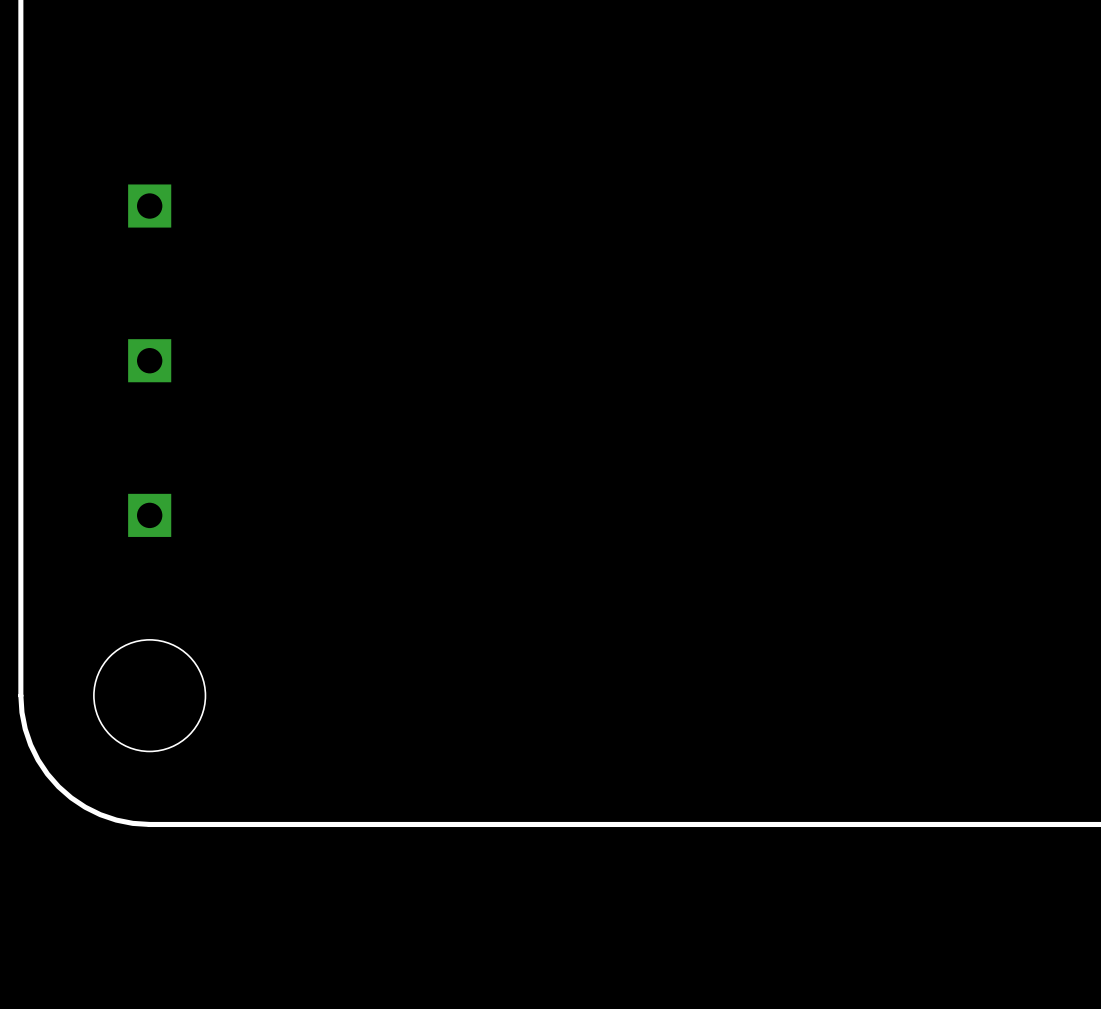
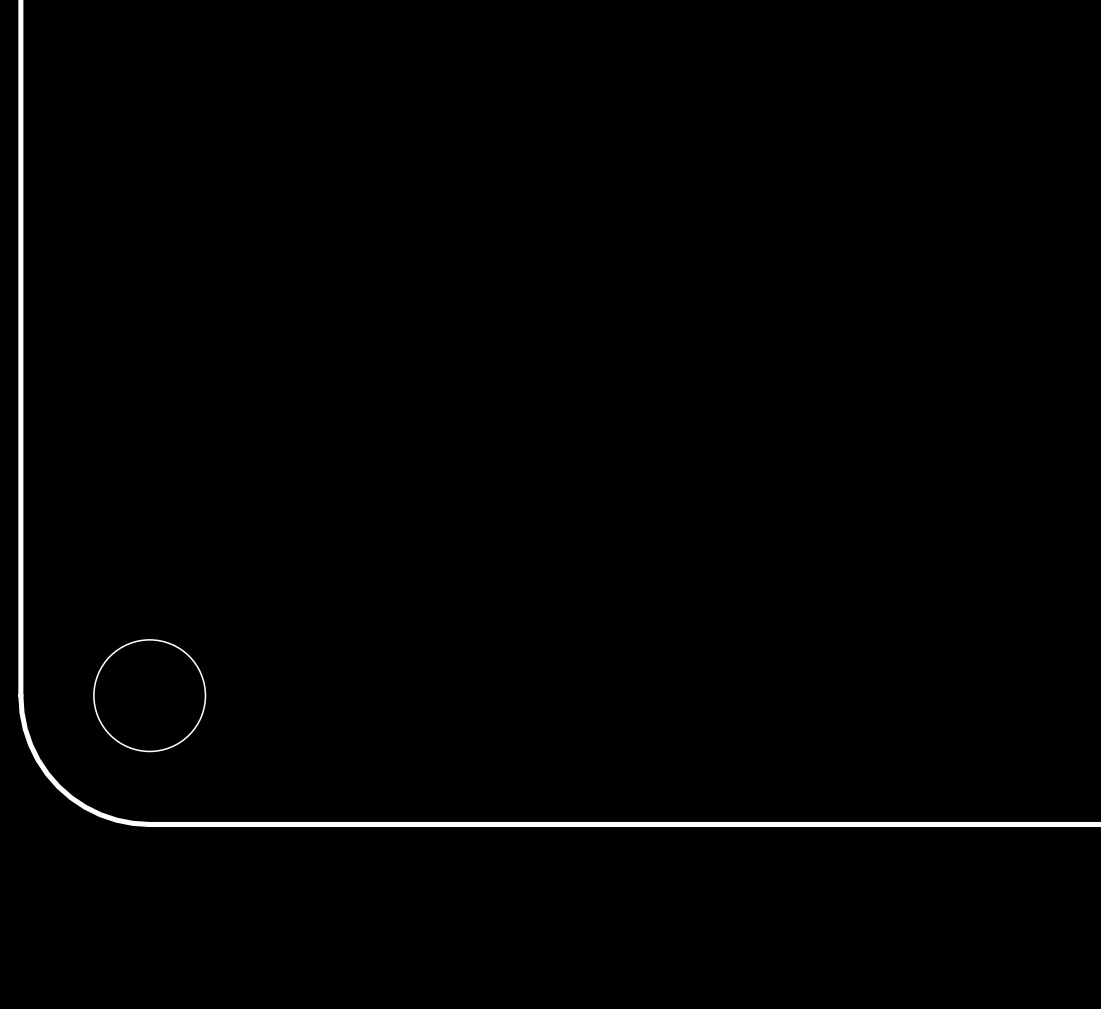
part: (149, 206) -> none
part: (149, 360) -> none
part: (149, 515) -> none

